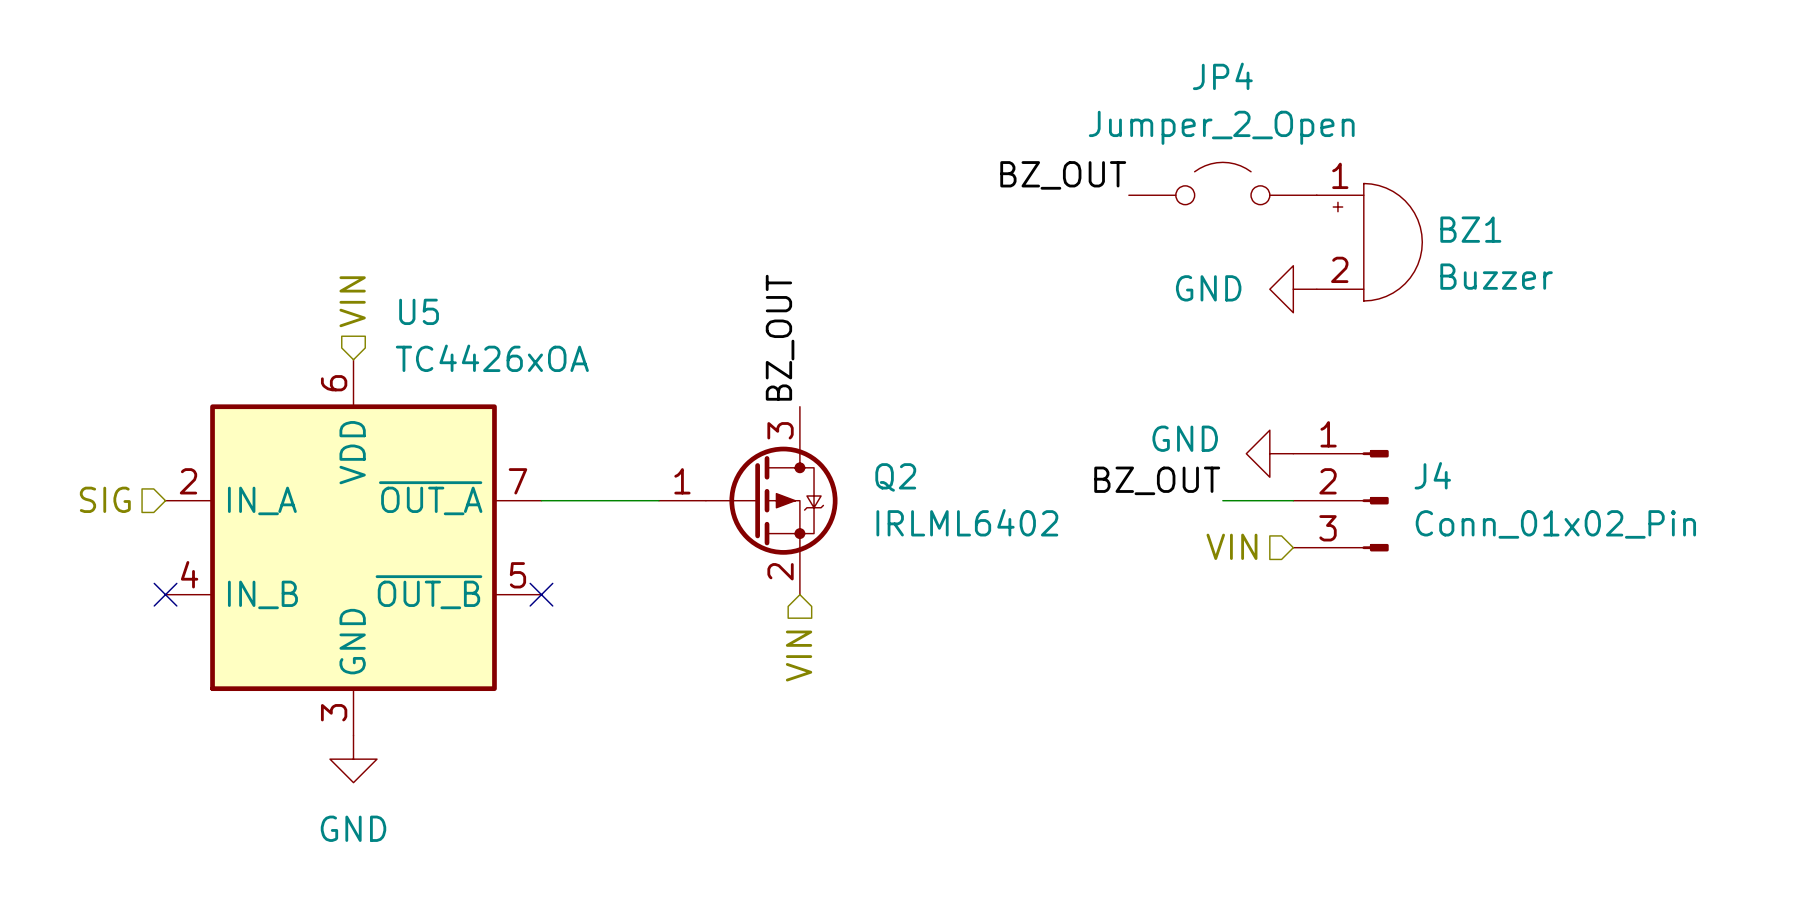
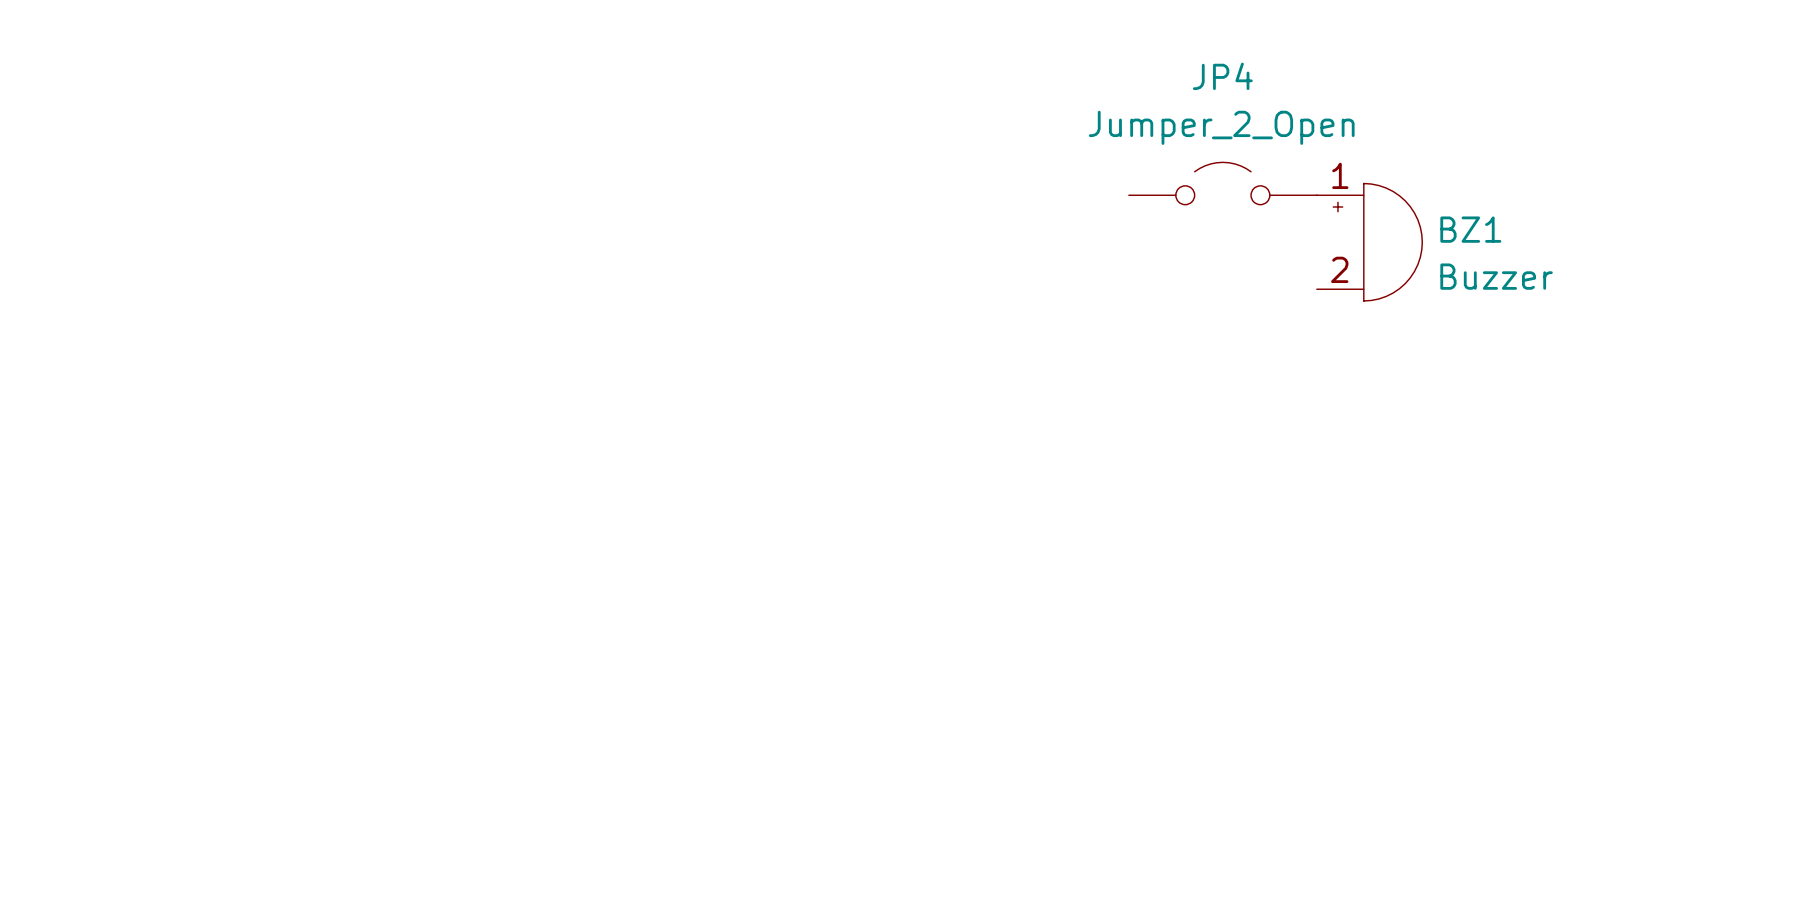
label: BZ_OUT (1063, 175) -> none
power symbol: GND (1293, 289) -> none
hierarchical label: VIN (352, 301) -> none
label: BZ_OUT (780, 337) -> none
power symbol: GND (1269, 453) -> none
label: BZ_OUT (1157, 480) -> none
hierarchical label: SIG (105, 499) -> none
wire: (541, 500) (658, 500) -> none
Q2: IRLML6402 (748, 500) -> none
wire: (1222, 500) (1293, 500) -> none
J4: Conn_01x02_Pin (1341, 500) -> none
hierarchical label: VIN (1231, 546) -> none
U5: TC4426xOA (353, 547) -> none
no-connect mark: (165, 594) -> none
no-connect mark: (541, 594) -> none
hierarchical label: VIN (799, 656) -> none
power symbol: GND (353, 759) -> none

